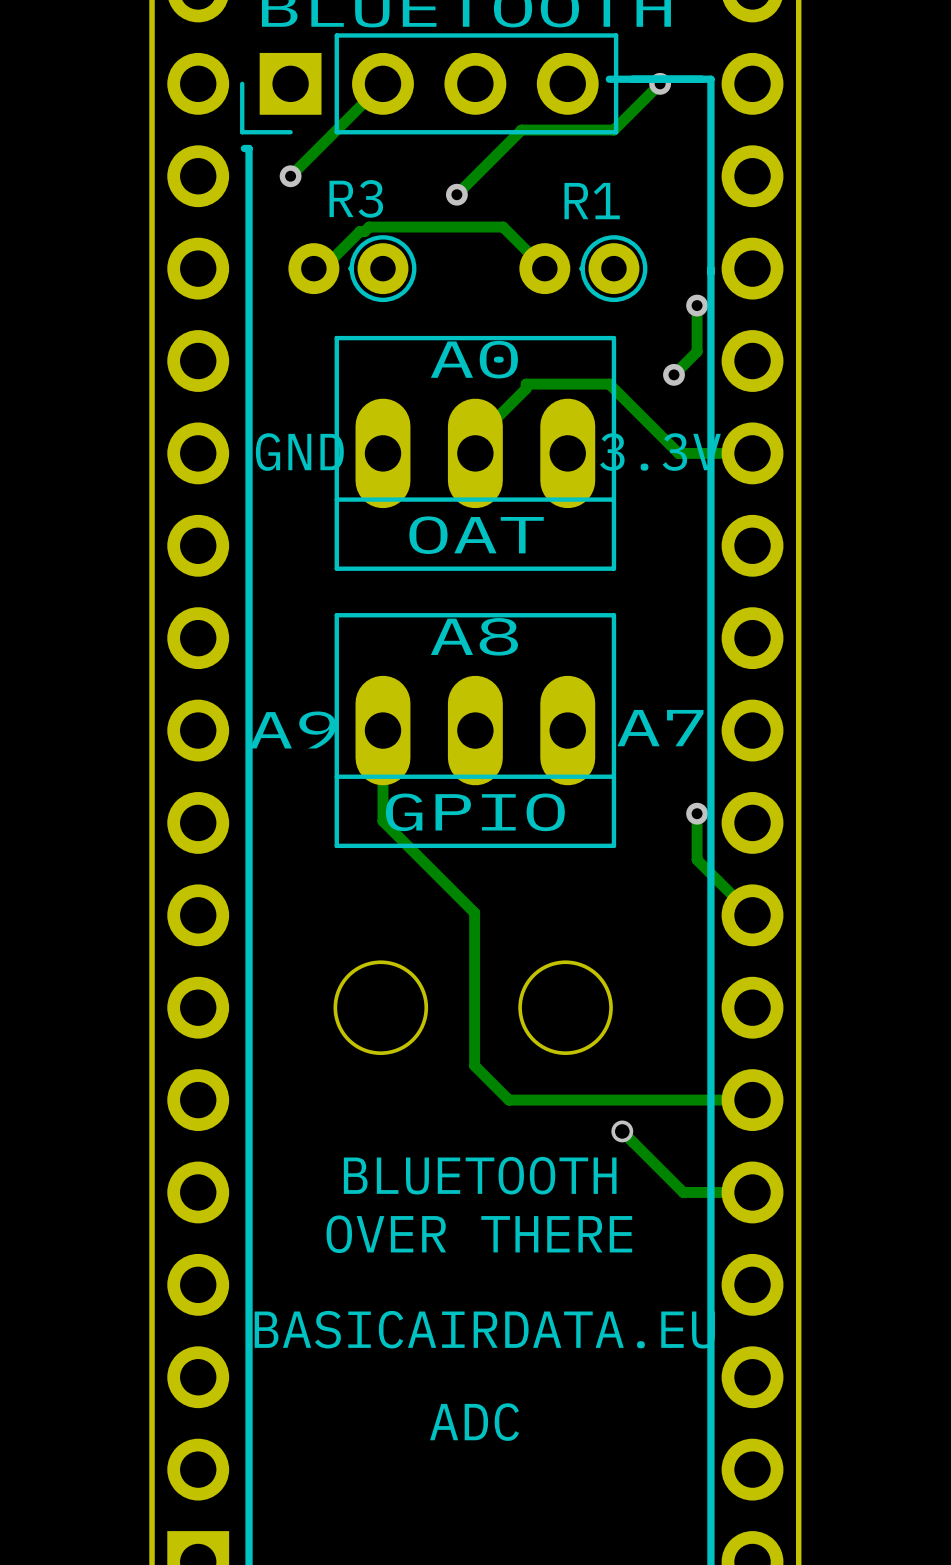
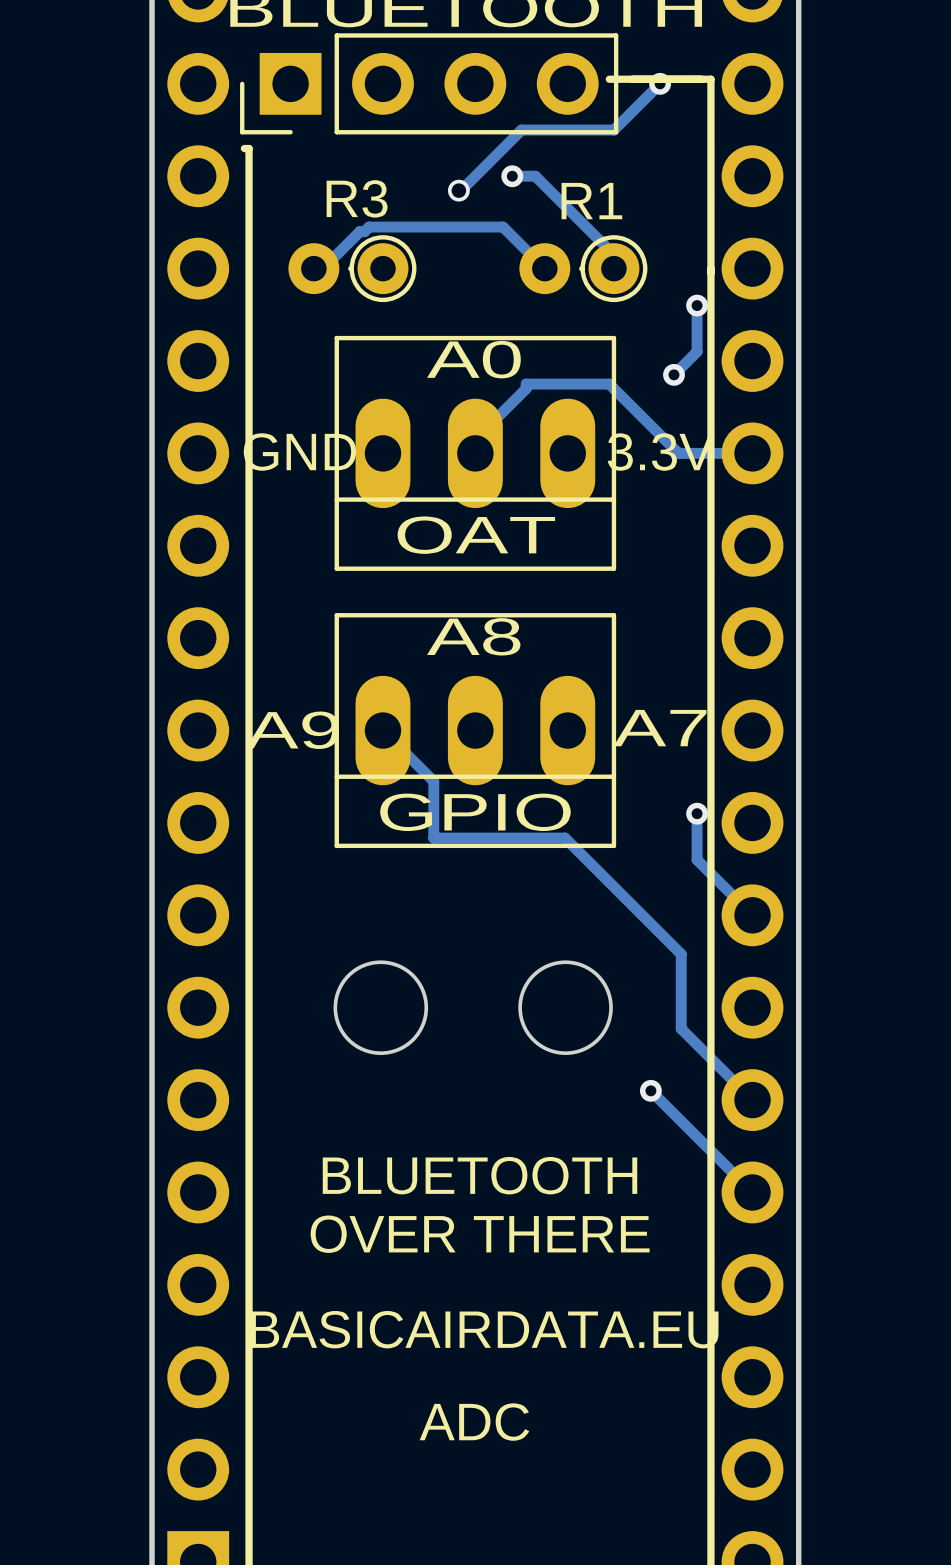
track: (382, 83) (290, 176) -> none
via: (290, 176) -> none
track: none -> (512, 176) (535, 176) (613, 254) (613, 268)
via: none -> (458, 190)
via position: (456, 194) -> (512, 176)
track: (382, 730) (382, 821) (474, 912) (474, 1065) (508, 1100) (752, 1100) -> (382, 730) (433, 781) (433, 838) (565, 838) (681, 954) (681, 1028) (752, 1100)
via: none -> (650, 1090)
track: (622, 1131) (683, 1192) (752, 1192) -> (650, 1090) (752, 1192)
via: (622, 1131) -> none

